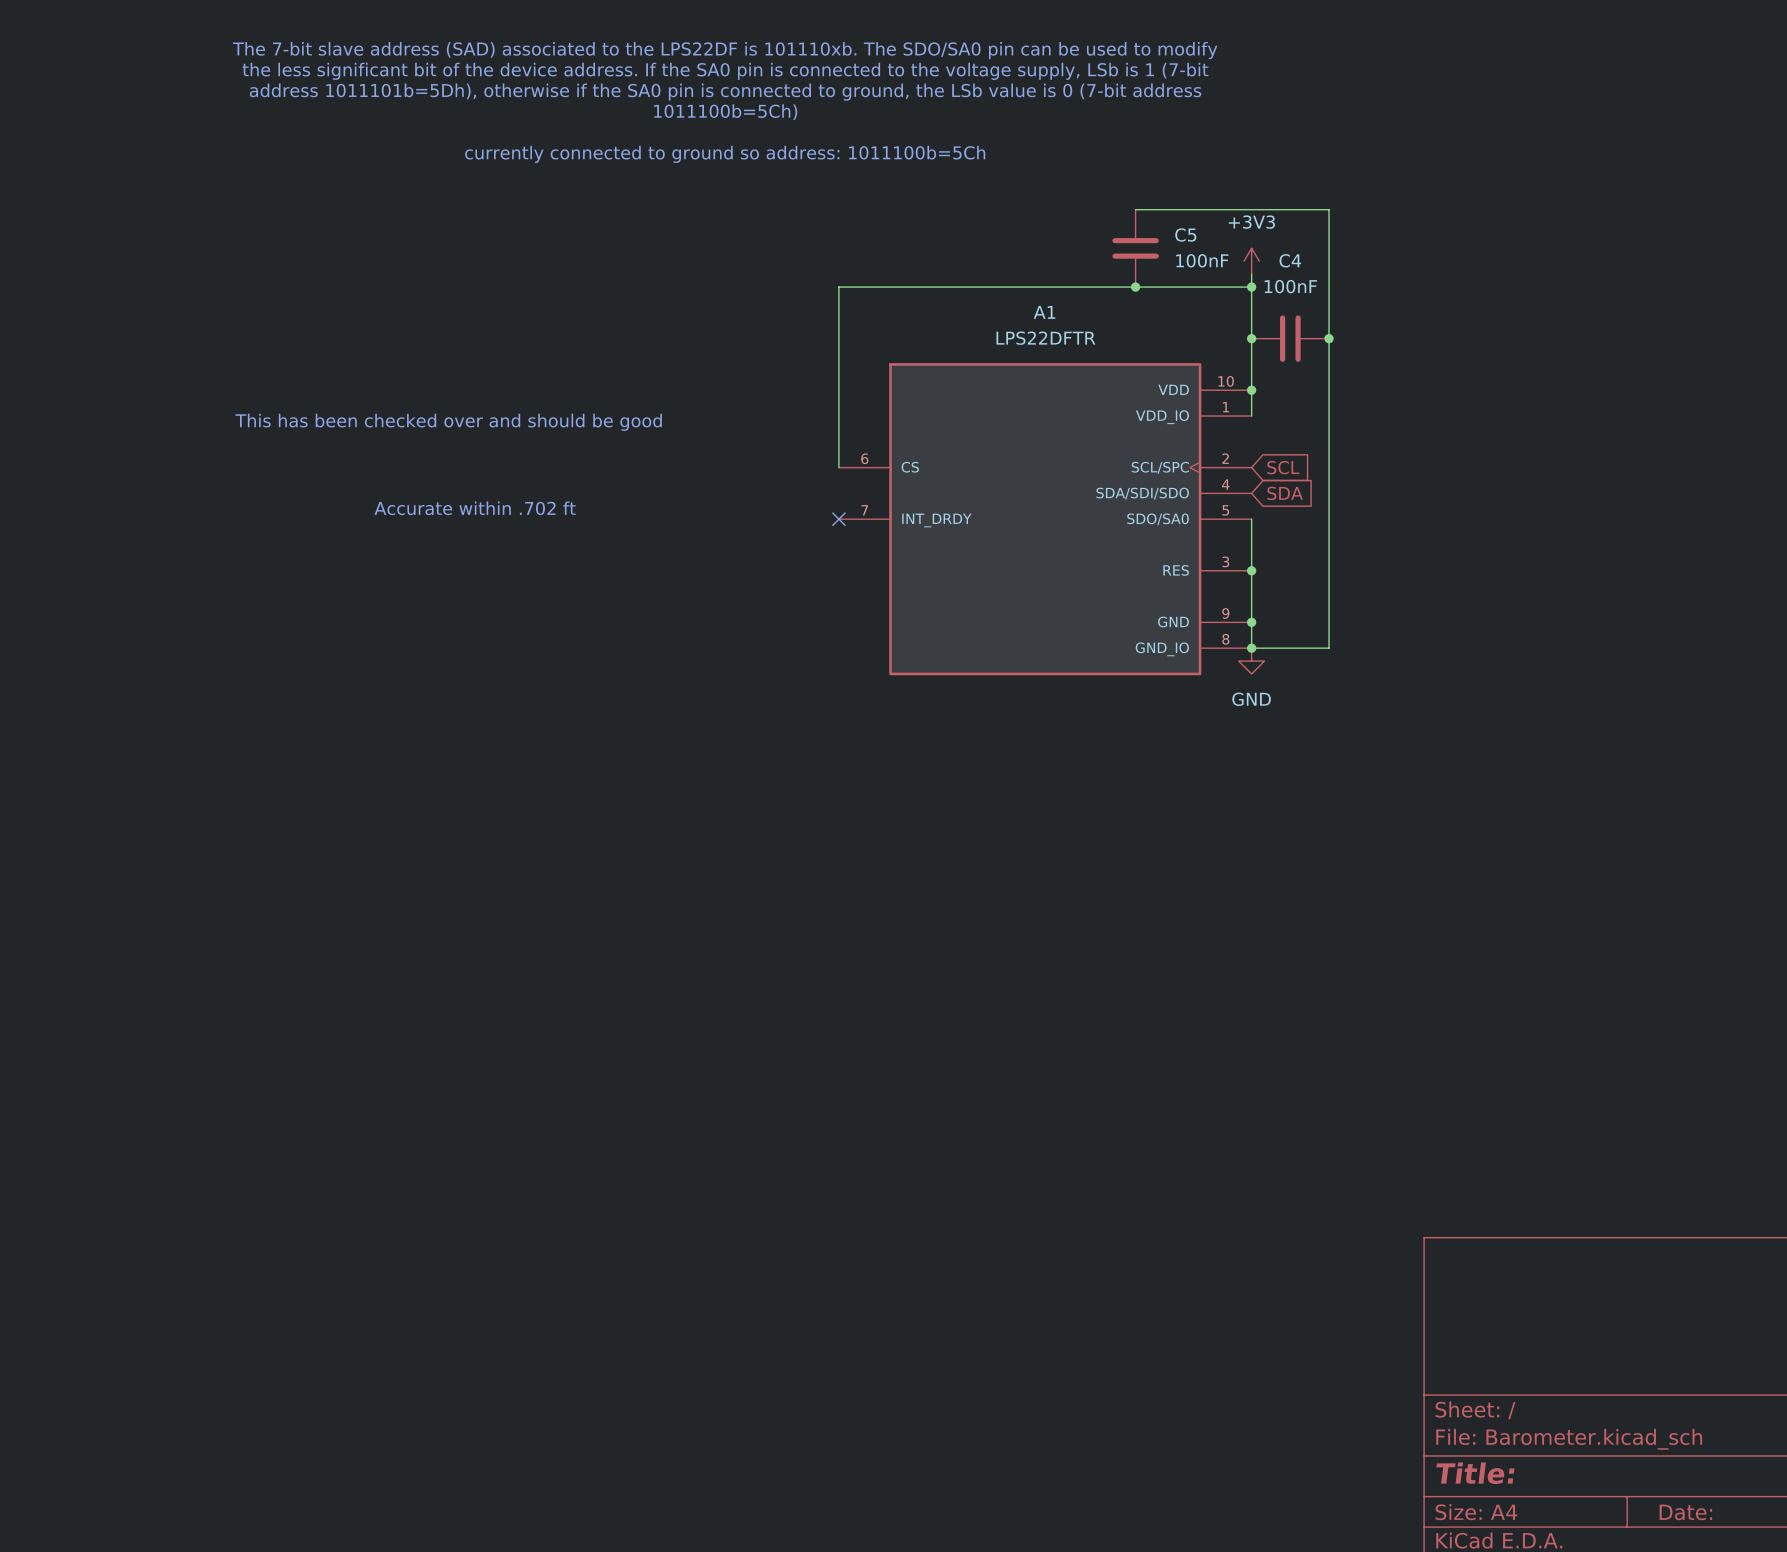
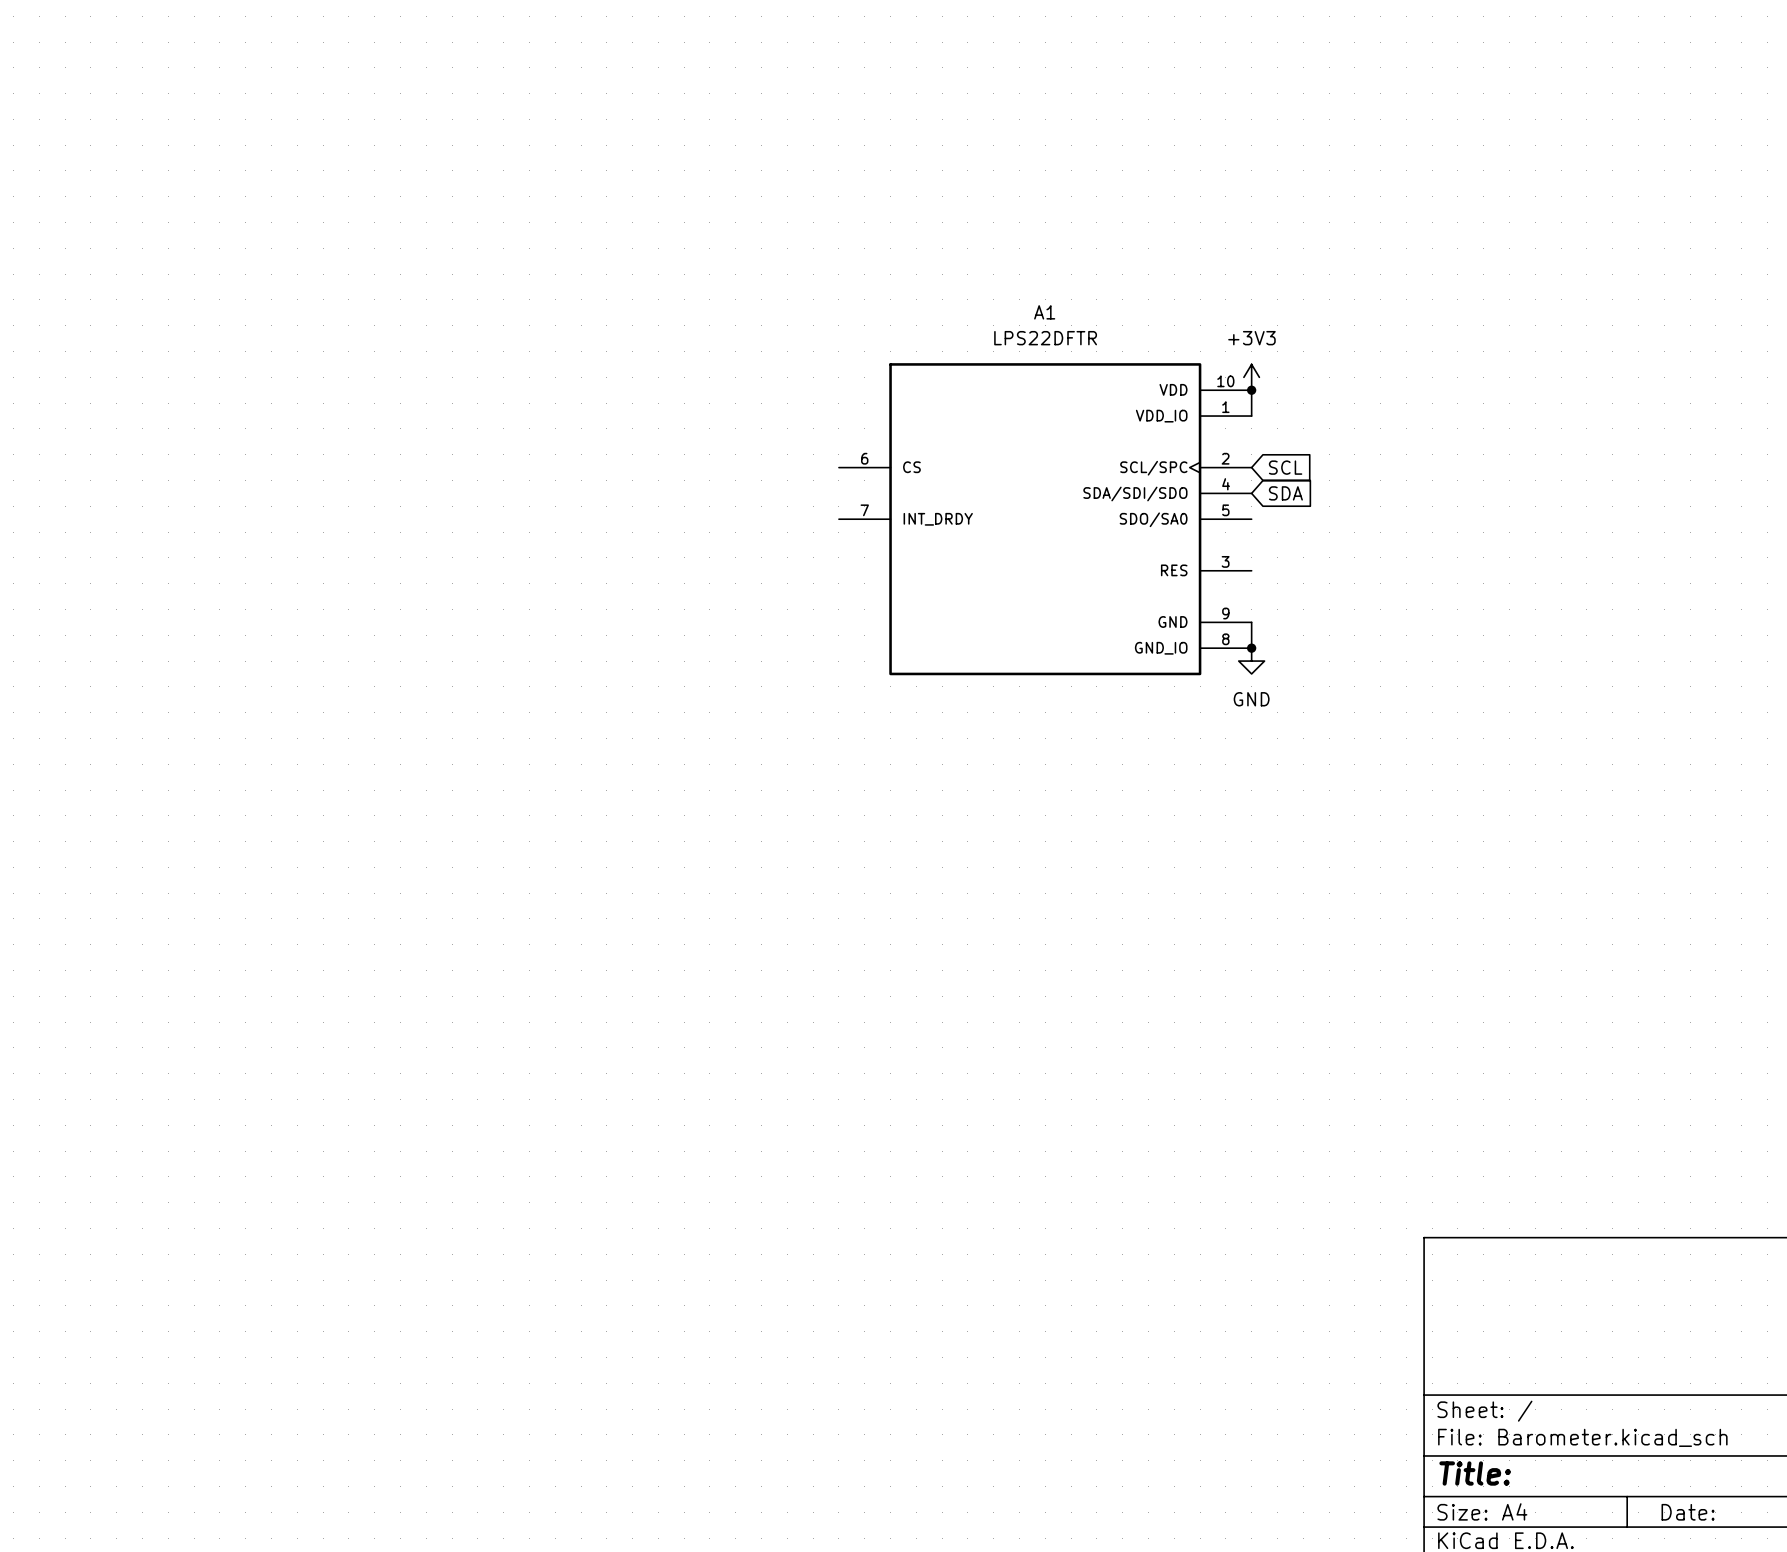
text: The 7-bit slave address (SAD) associated to the LPS22DF is 101110xb. The SDO/SA0 pin can be used to modify (725, 50) -> none
text: the less significant bit of the device address. If the SA0 pin is connected to the voltage supply, LSb is 1 (7-bit (725, 71) -> none
text: address 1011101b=5Dh), otherwise if the SA0 pin is connected to ground, the LSb value is 0 (7-bit address (725, 92) -> none
text: 1011100b=5Ch) (725, 112) -> none
text: currently connected to ground so address: 1011100b=5Ch (725, 154) -> none
wire: (1135, 209) (1329, 209) (1329, 648) (1251, 648) -> none
C5: 100nF (1135, 248) -> none
power symbol position: +3V3 (1251, 261) -> +3V3 (1251, 377)
wire: (1251, 274) (1251, 390) -> none
junction: (1135, 287) -> none
wire: (1251, 287) (838, 287) (838, 467) -> none
junction: (1251, 287) -> none
junction: (1251, 338) -> none
C4: 100nF (1290, 338) -> none
junction: (1329, 338) -> none
text: This has been checked over and should be good (448, 422) -> none
text: Accurate within .702 ft (475, 508) -> none
no-connect mark: (838, 519) -> none
wire: (1251, 519) (1251, 622) -> none
junction: (1251, 570) -> none
junction: (1251, 622) -> none

